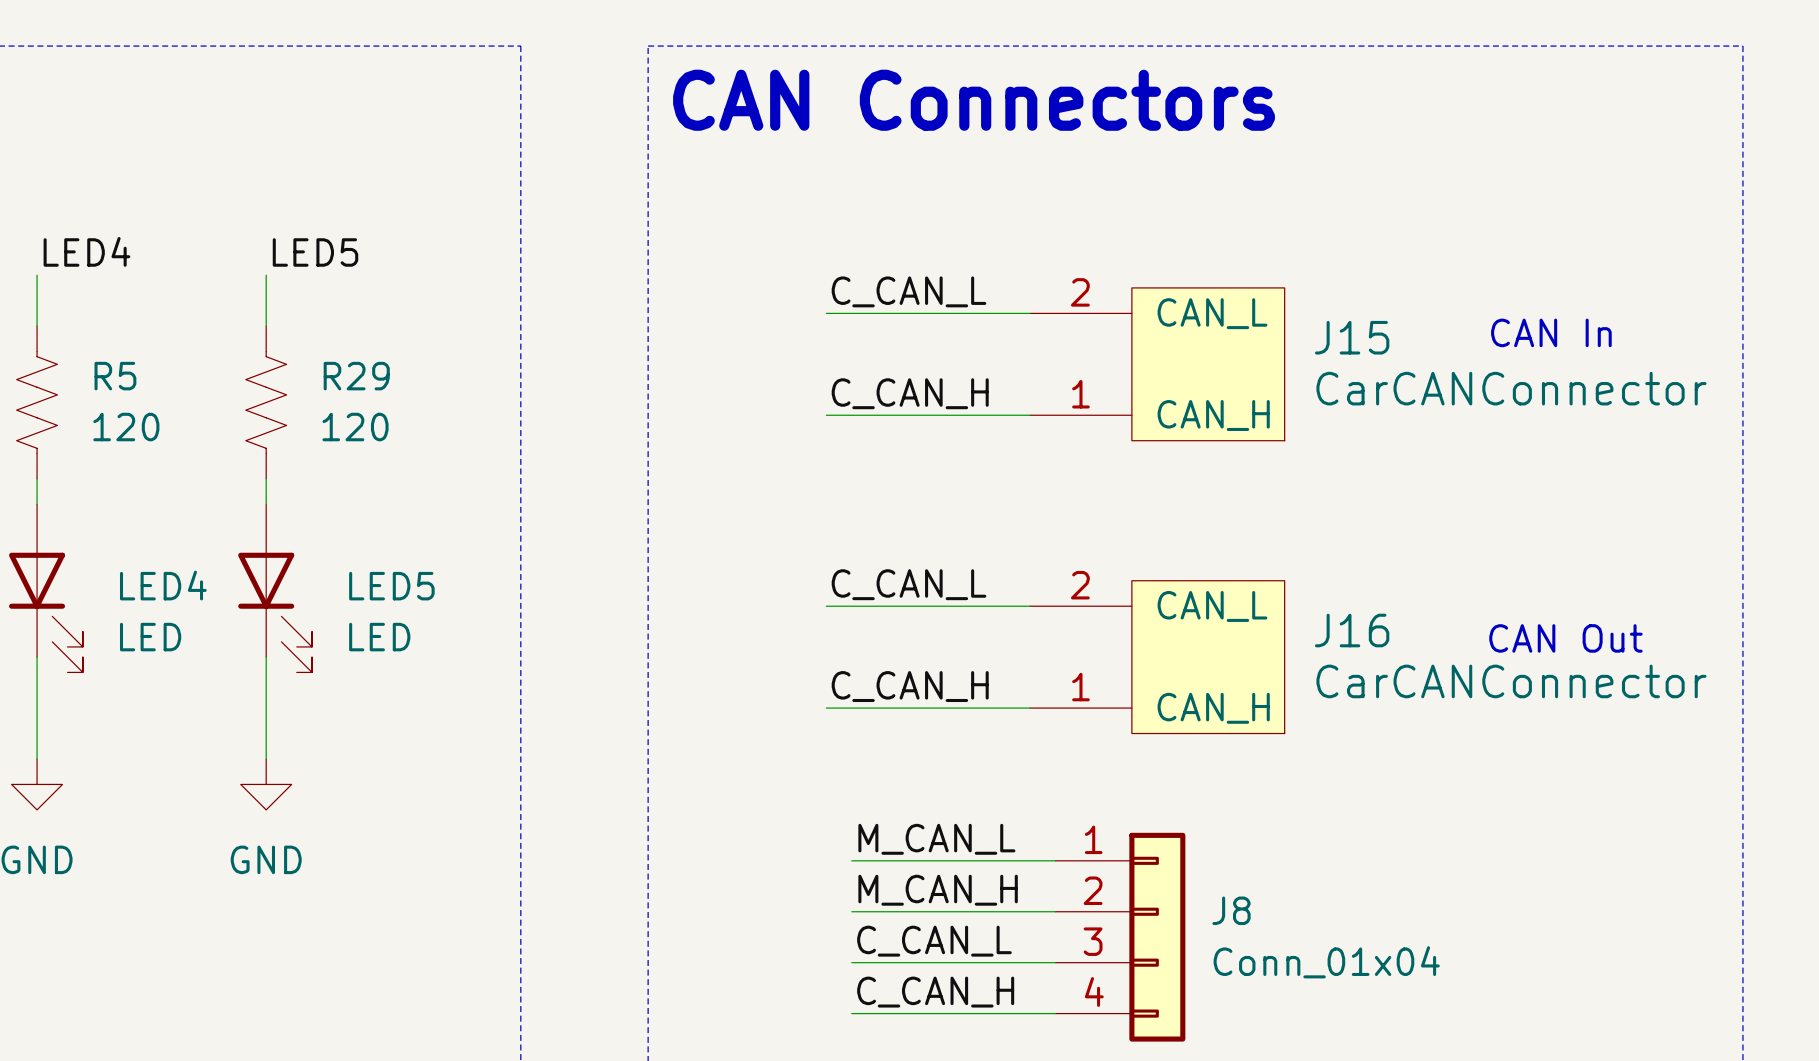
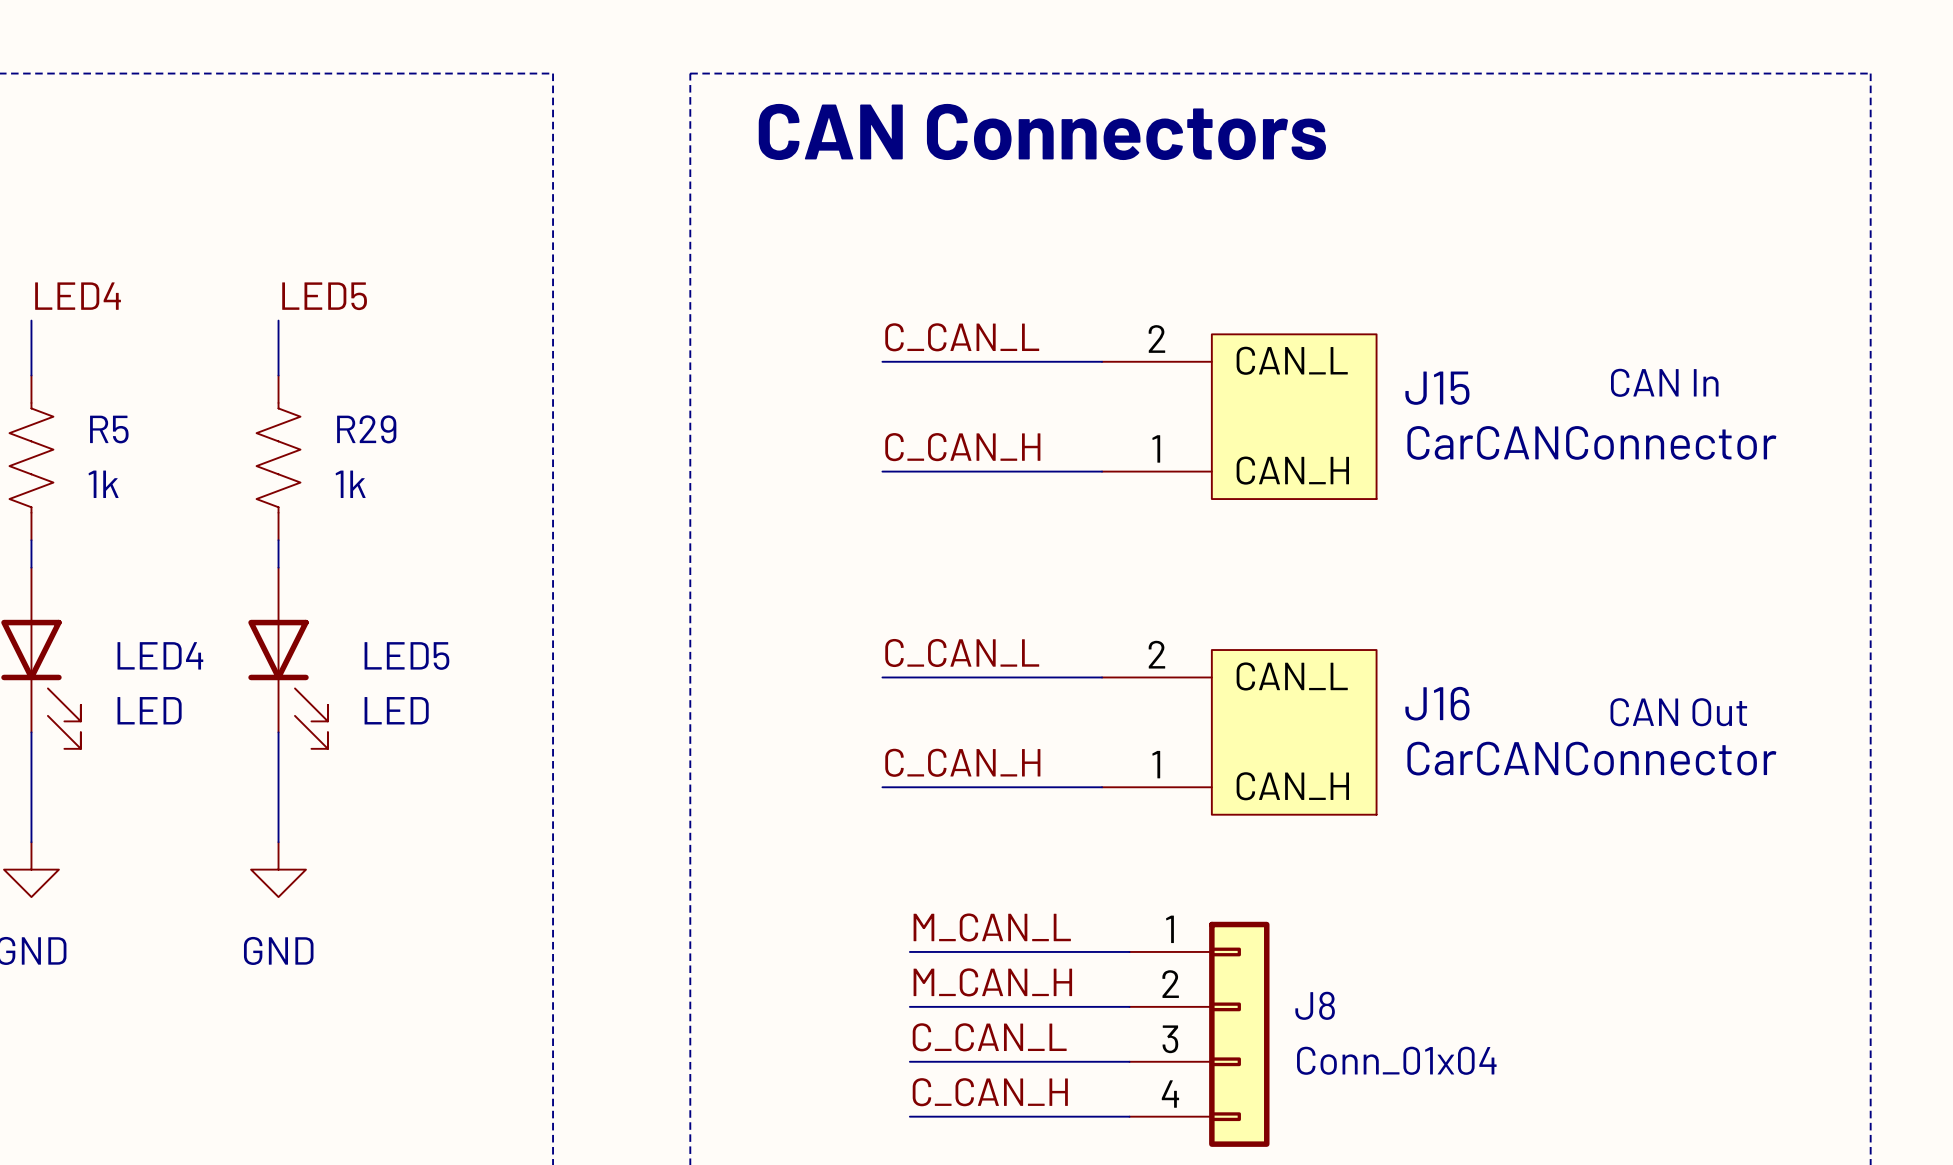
R5 value: 120 (126, 427) -> 1k (103, 484)
R29 value: 120 (355, 427) -> 1k (350, 484)

